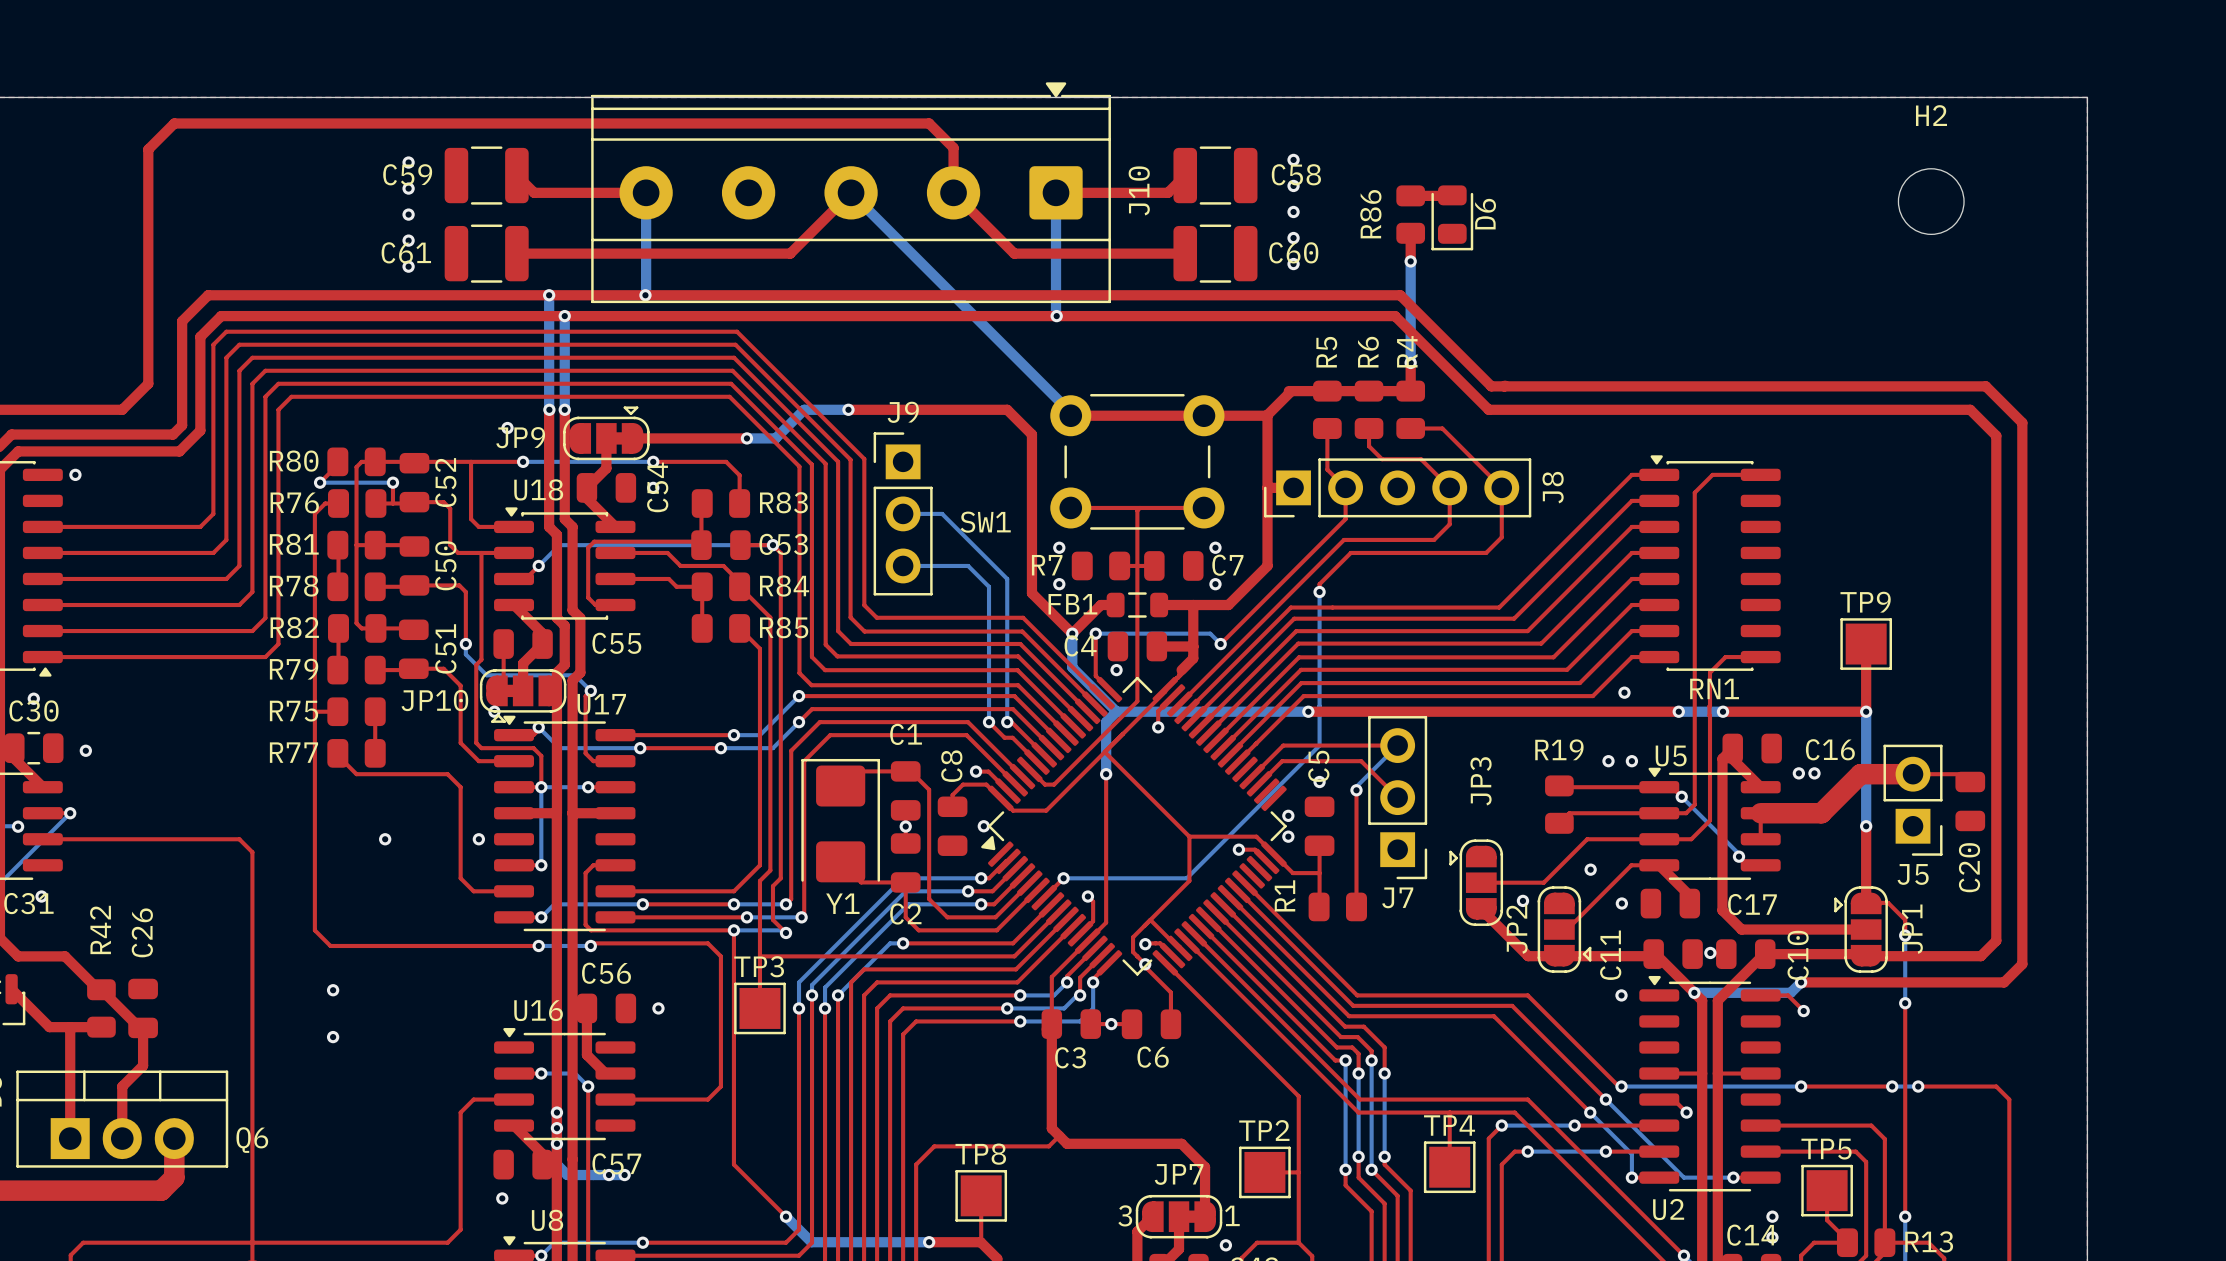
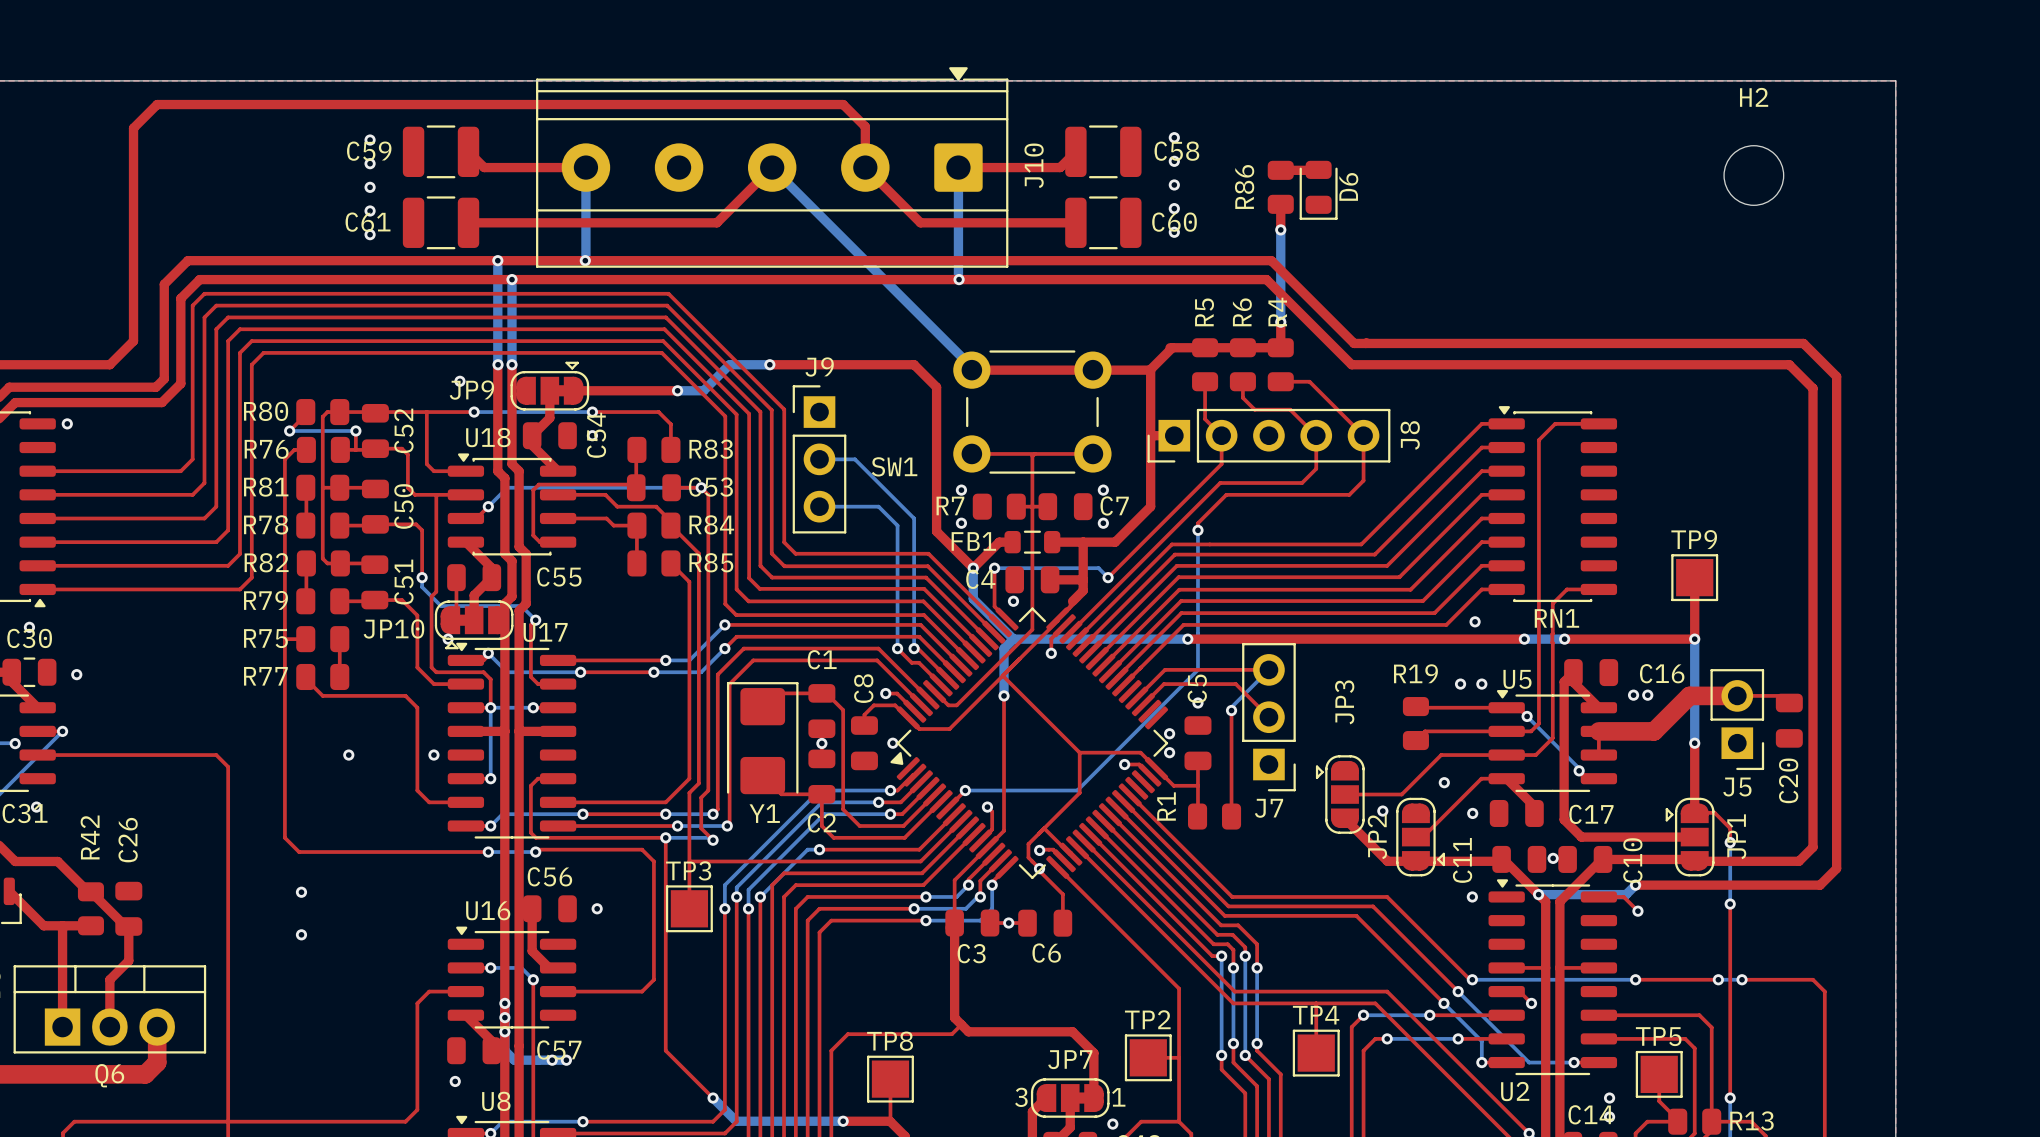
Q6 name position: Q6 (252, 1140) -> Q6 (109, 1075)

